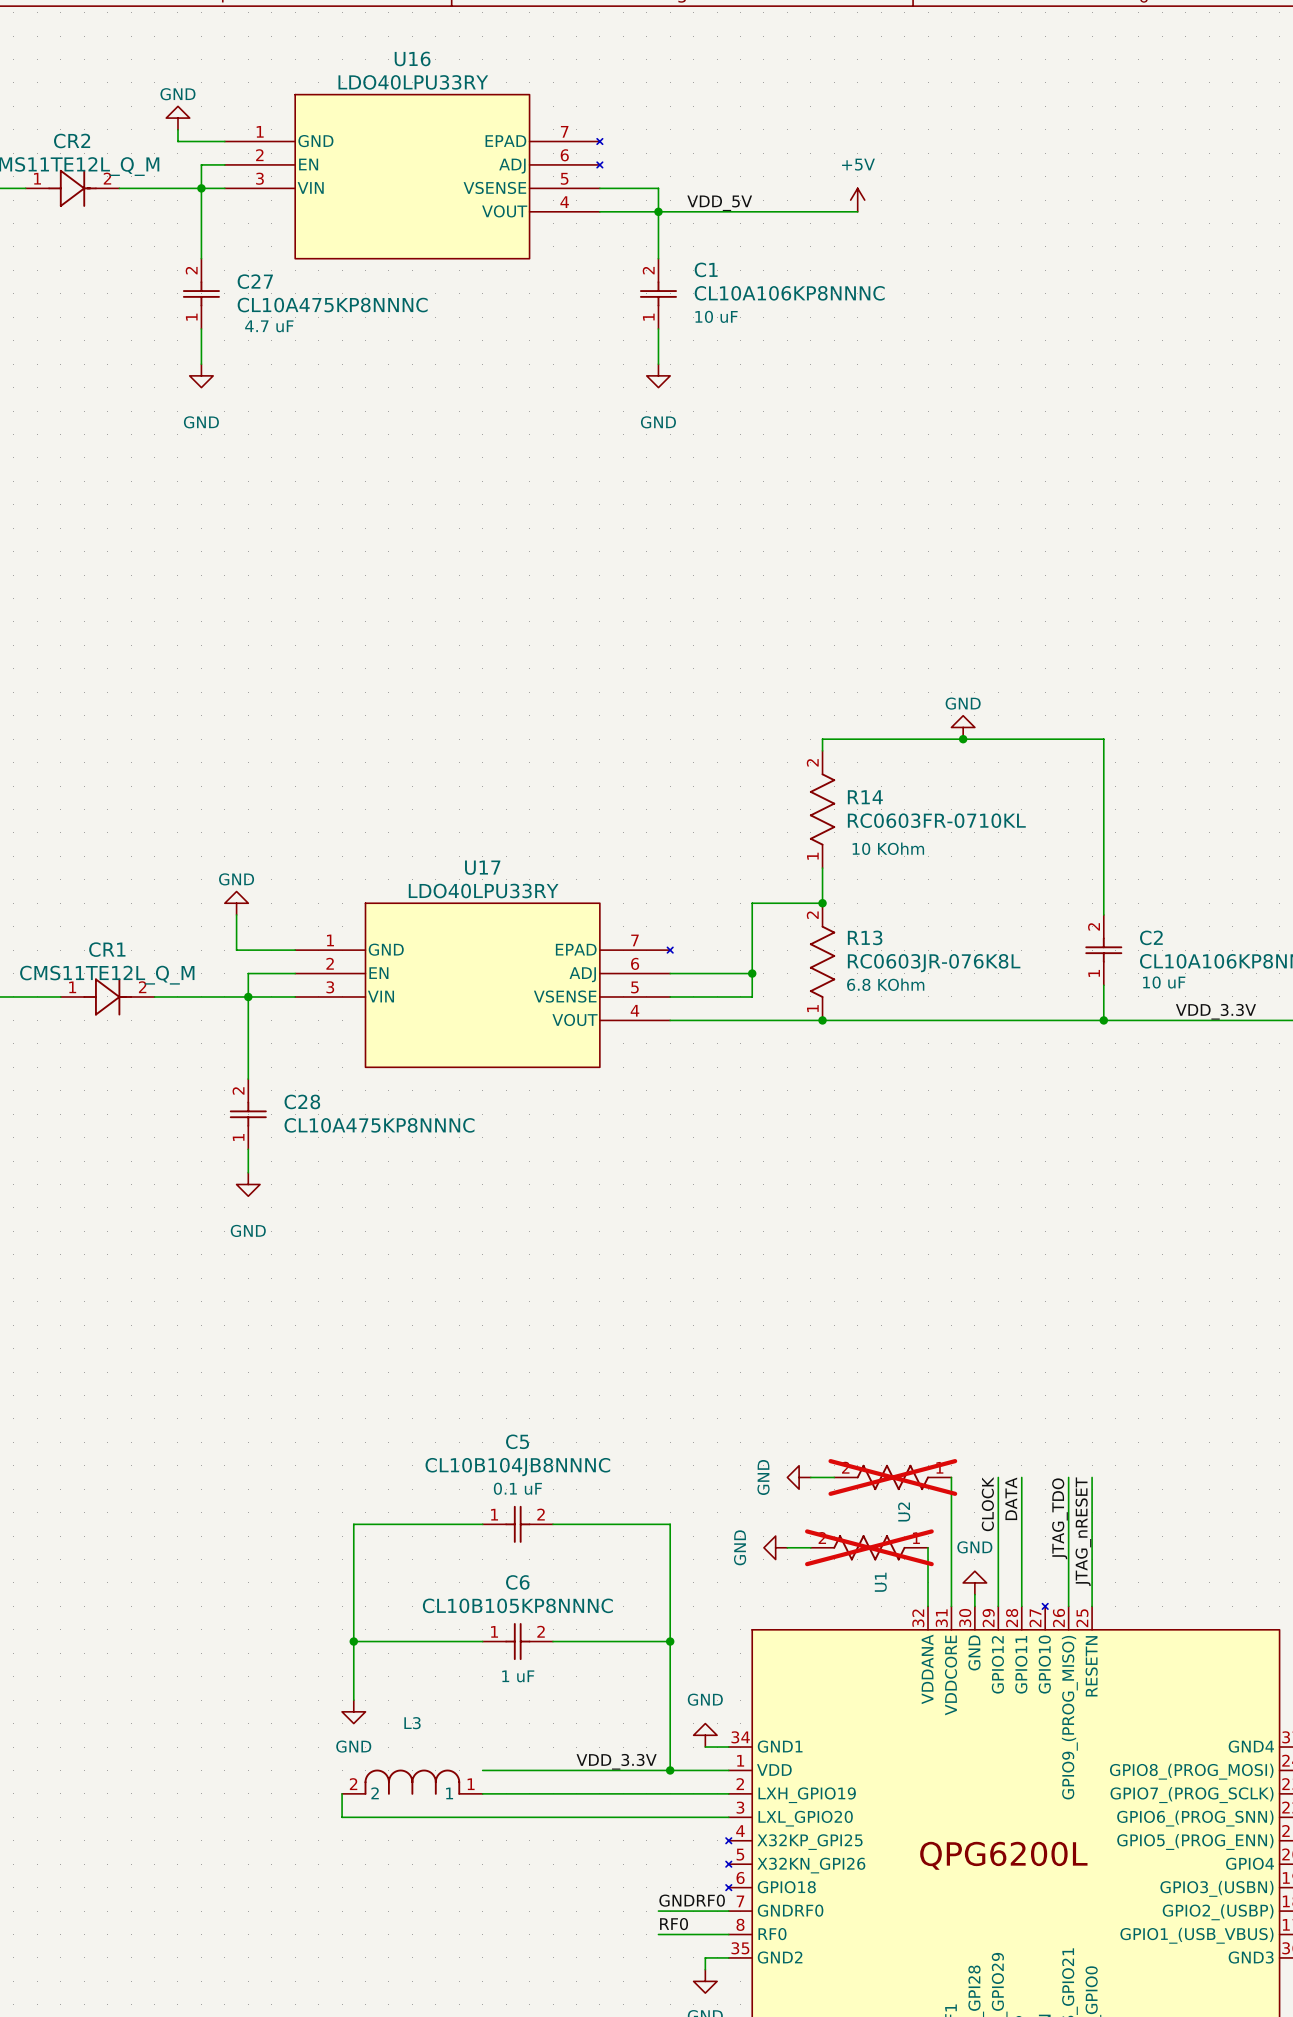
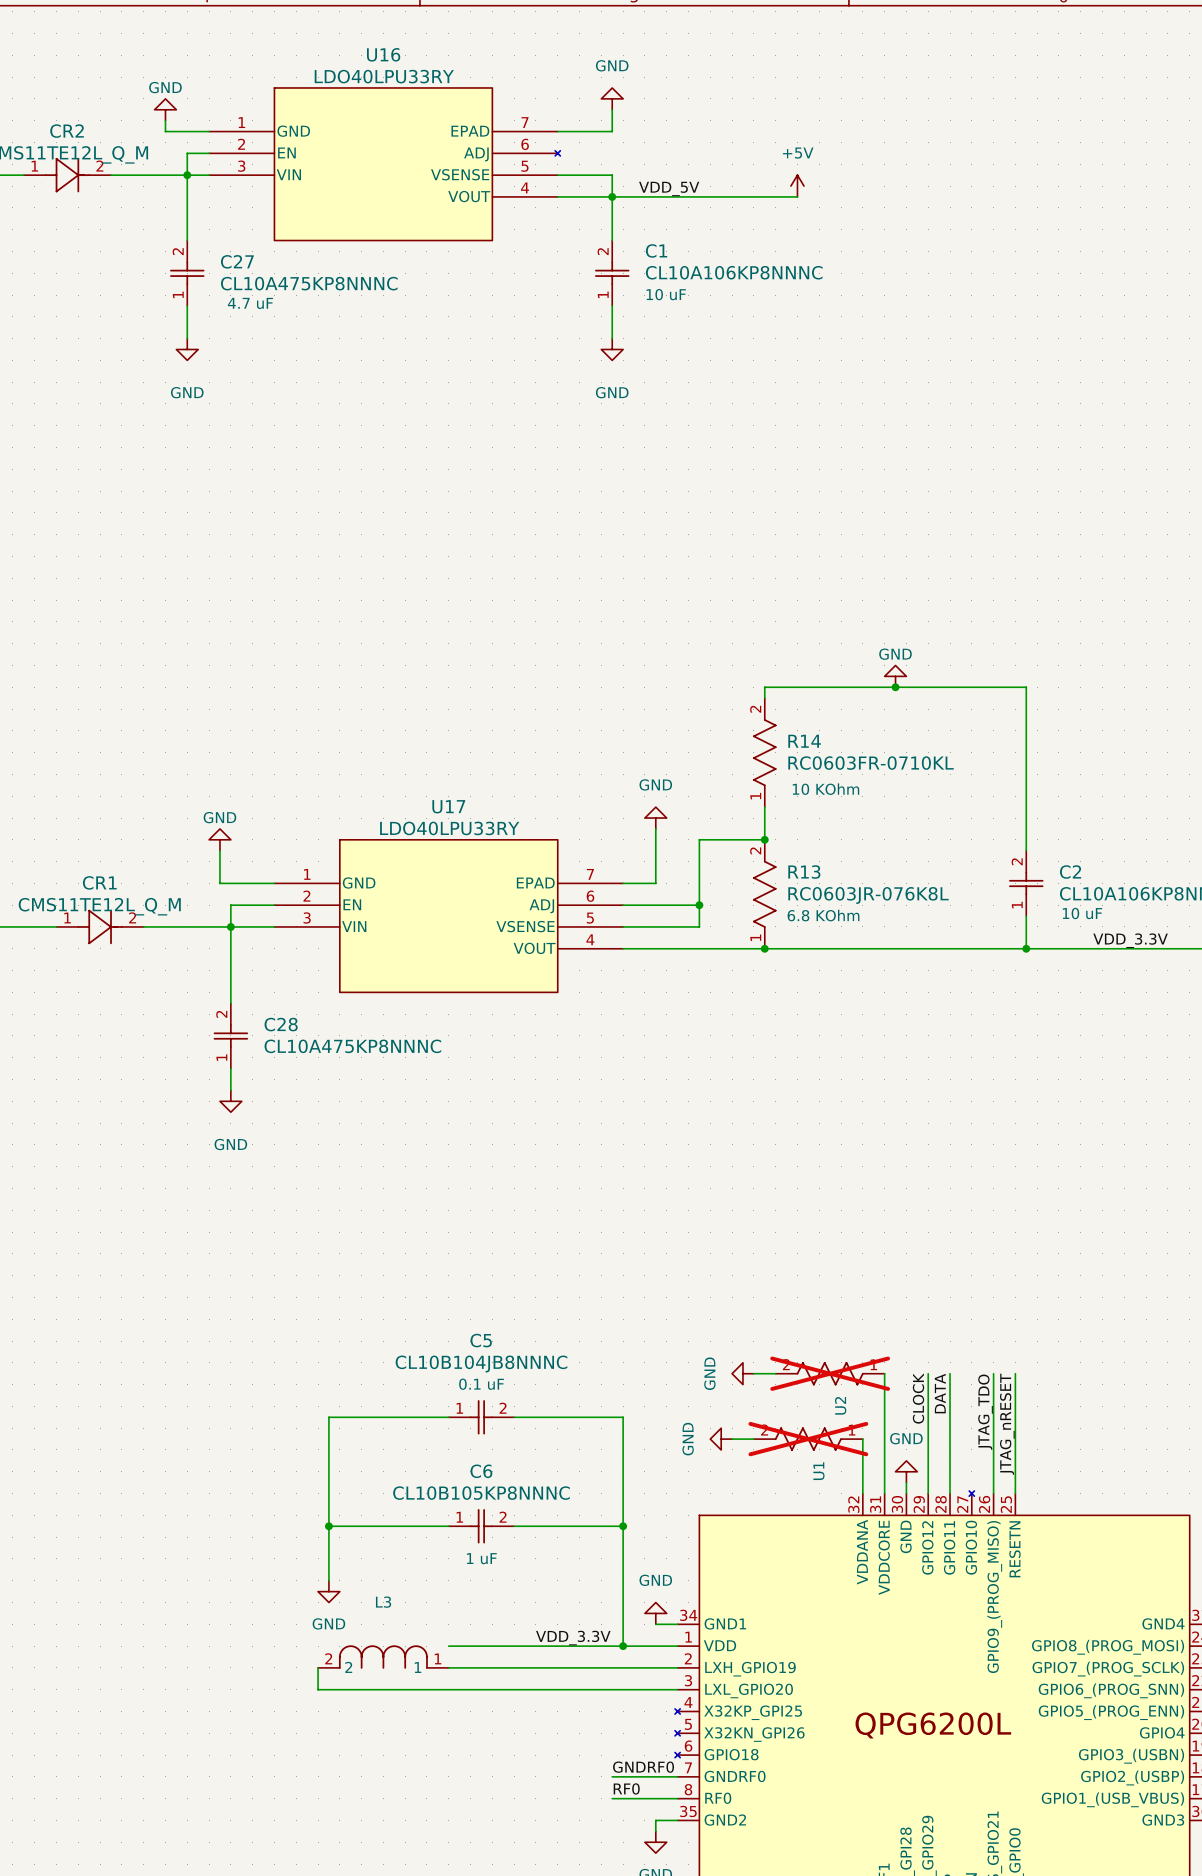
U16 symbol: [224, 94, 603, 259] -> [209, 87, 561, 241]
power symbol: none -> GND (612, 98)
wire: none -> (612, 109) (612, 131) (557, 131)
power symbol: none -> GND (655, 818)
wire: none -> (655, 828) (655, 883) (623, 883)
U17 symbol: [295, 903, 673, 1068] -> [274, 839, 624, 993]

